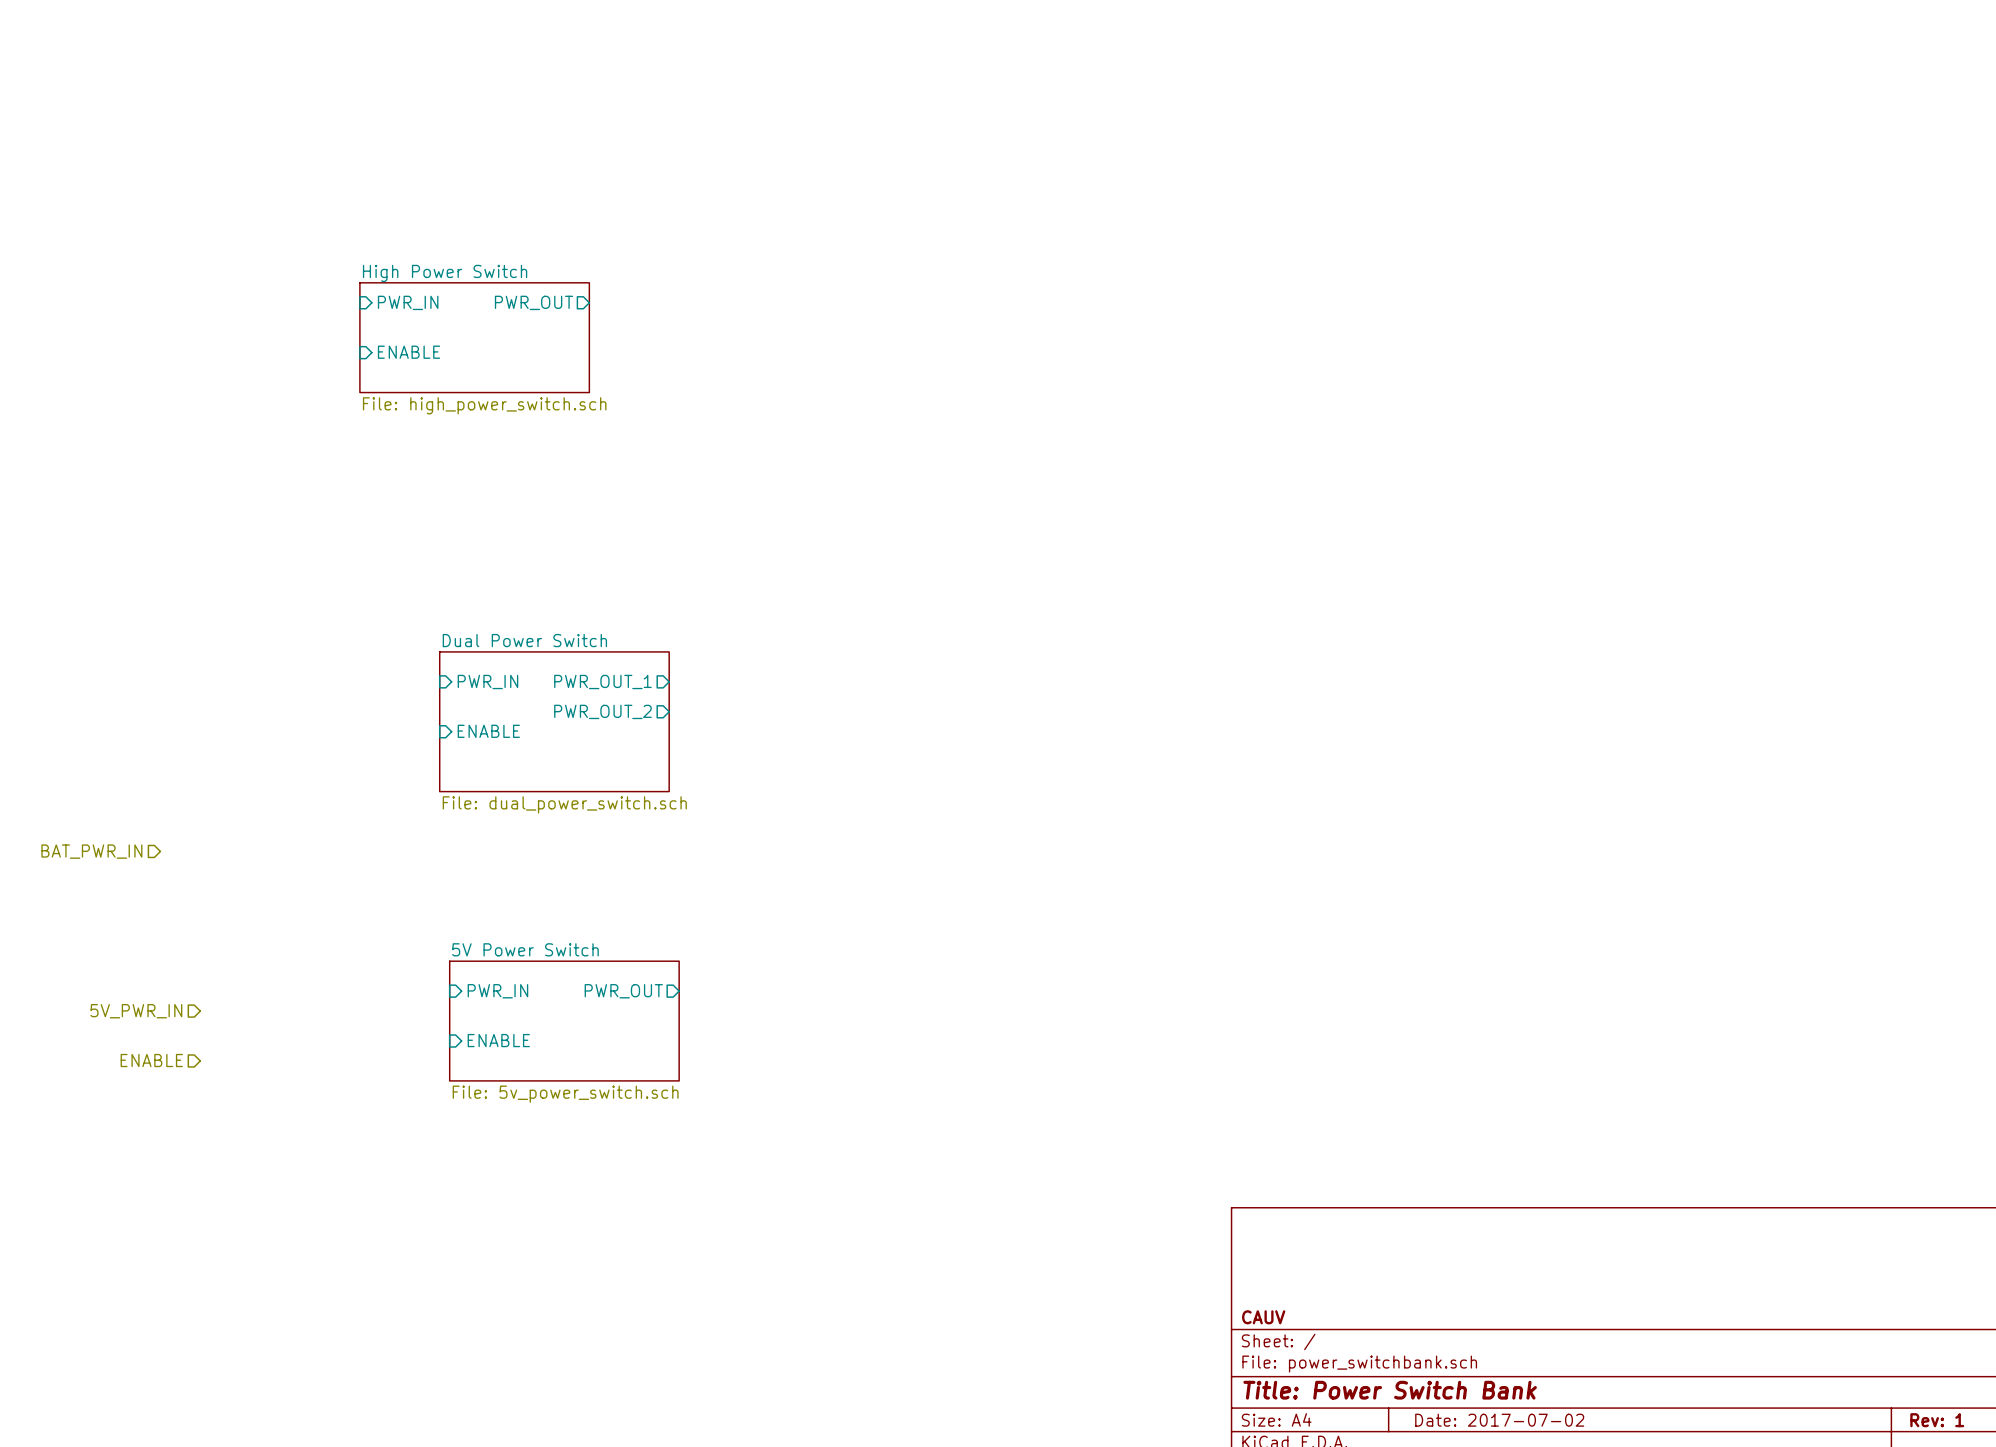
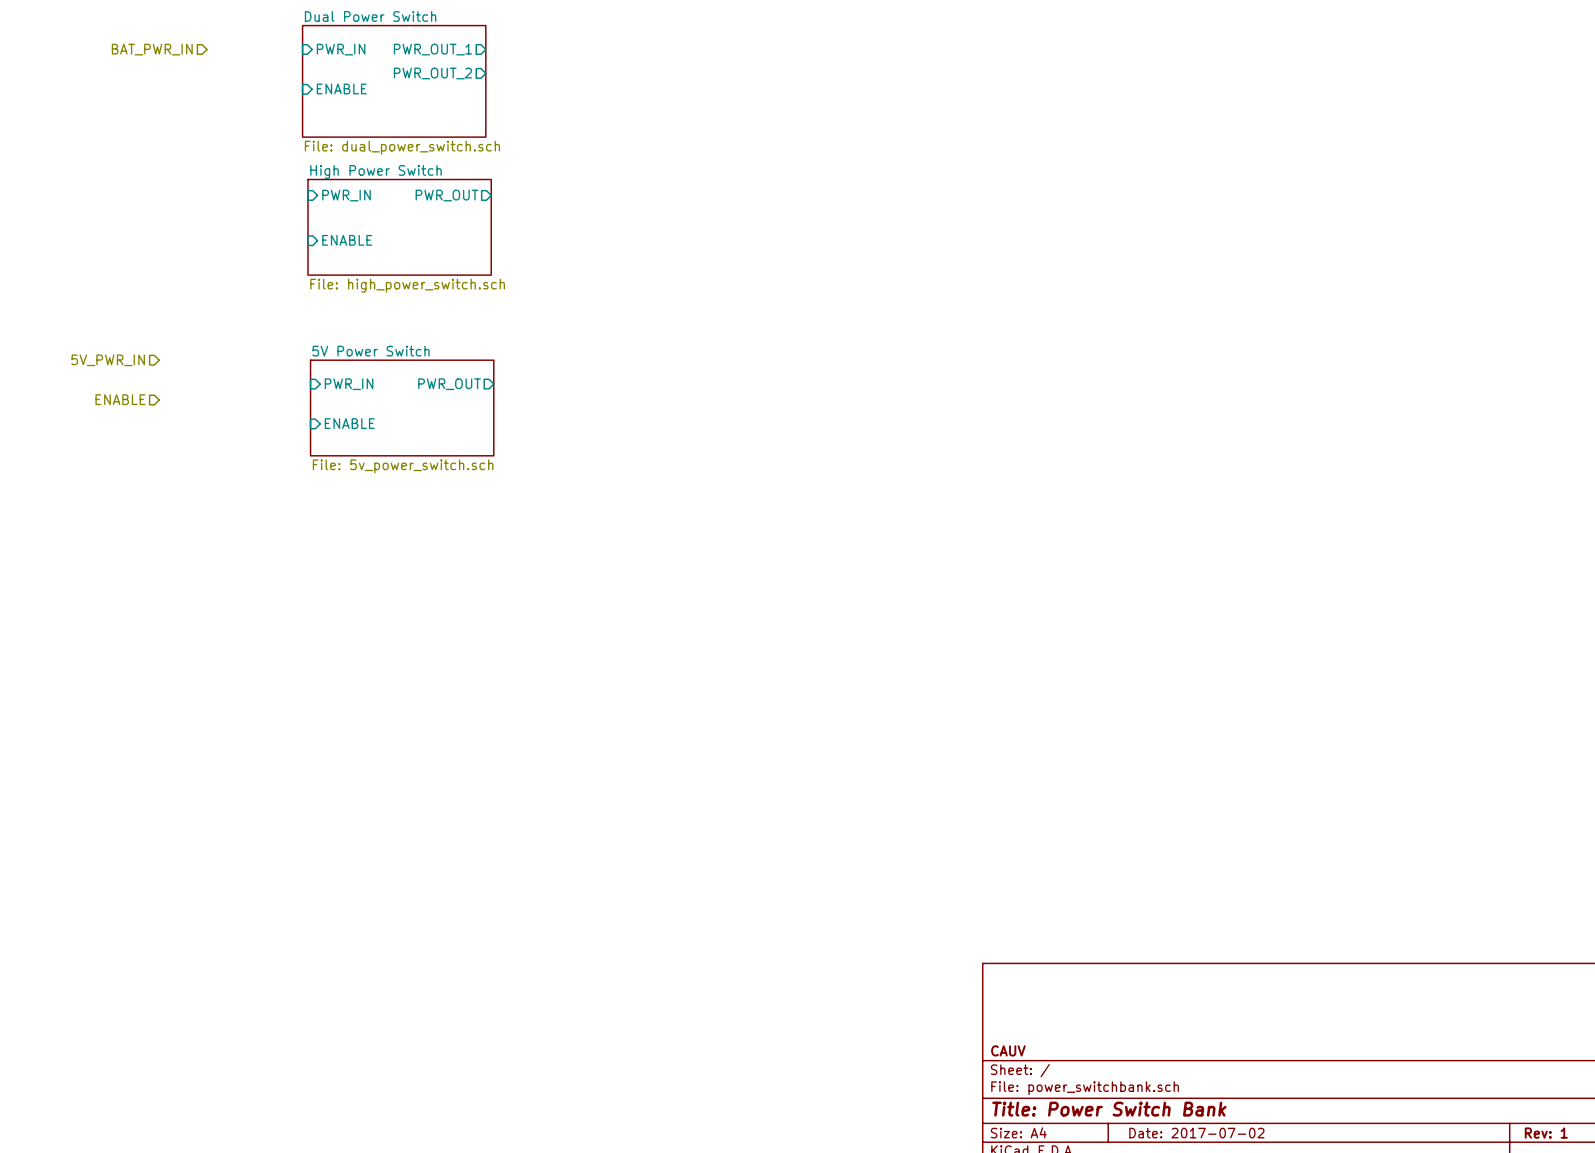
hierarchical label: none -> BAT_PWR_IN (152, 49)
sheet pin: none -> PWR_IN (341, 49)
sheet pin: none -> PWR_OUT_1 (432, 49)
sheet pin: none -> PWR_OUT_2 (432, 73)
sheet Dual Power Switch: none -> File: dual_power_switch.sch (394, 81)
sheet pin: none -> ENABLE (341, 88)
sheet High Power Switch: none -> File: high_power_switch.sch (399, 227)
sheet pin position: PWR_IN (408, 302) -> PWR_IN (346, 195)
sheet pin position: PWR_OUT (533, 302) -> PWR_OUT (447, 195)
sheet High Power Switch: File: high_power_switch.sch (474, 337) -> none
sheet pin position: ENABLE (409, 352) -> ENABLE (347, 240)
hierarchical label: none -> 5V_PWR_IN (108, 360)
sheet pin: none -> PWR_IN (349, 384)
sheet pin: none -> PWR_OUT (449, 384)
hierarchical label: none -> ENABLE (120, 399)
sheet pin: none -> ENABLE (349, 423)
sheet pin: PWR_IN (487, 681) -> none
sheet pin: PWR_OUT_1 (602, 681) -> none
sheet pin: PWR_OUT_2 (602, 711) -> none
sheet Dual Power Switch: File: dual_power_switch.sch (554, 721) -> none
sheet pin: ENABLE (488, 731) -> none
hierarchical label: BAT_PWR_IN (91, 851) -> none
sheet pin: PWR_IN (497, 991) -> none
sheet pin: PWR_OUT (623, 991) -> none
hierarchical label: 5V_PWR_IN (136, 1011) -> none
sheet 5V Power Switch position: (564, 1021) -> (402, 408)
sheet pin: ENABLE (498, 1040) -> none
hierarchical label: ENABLE (151, 1060) -> none

